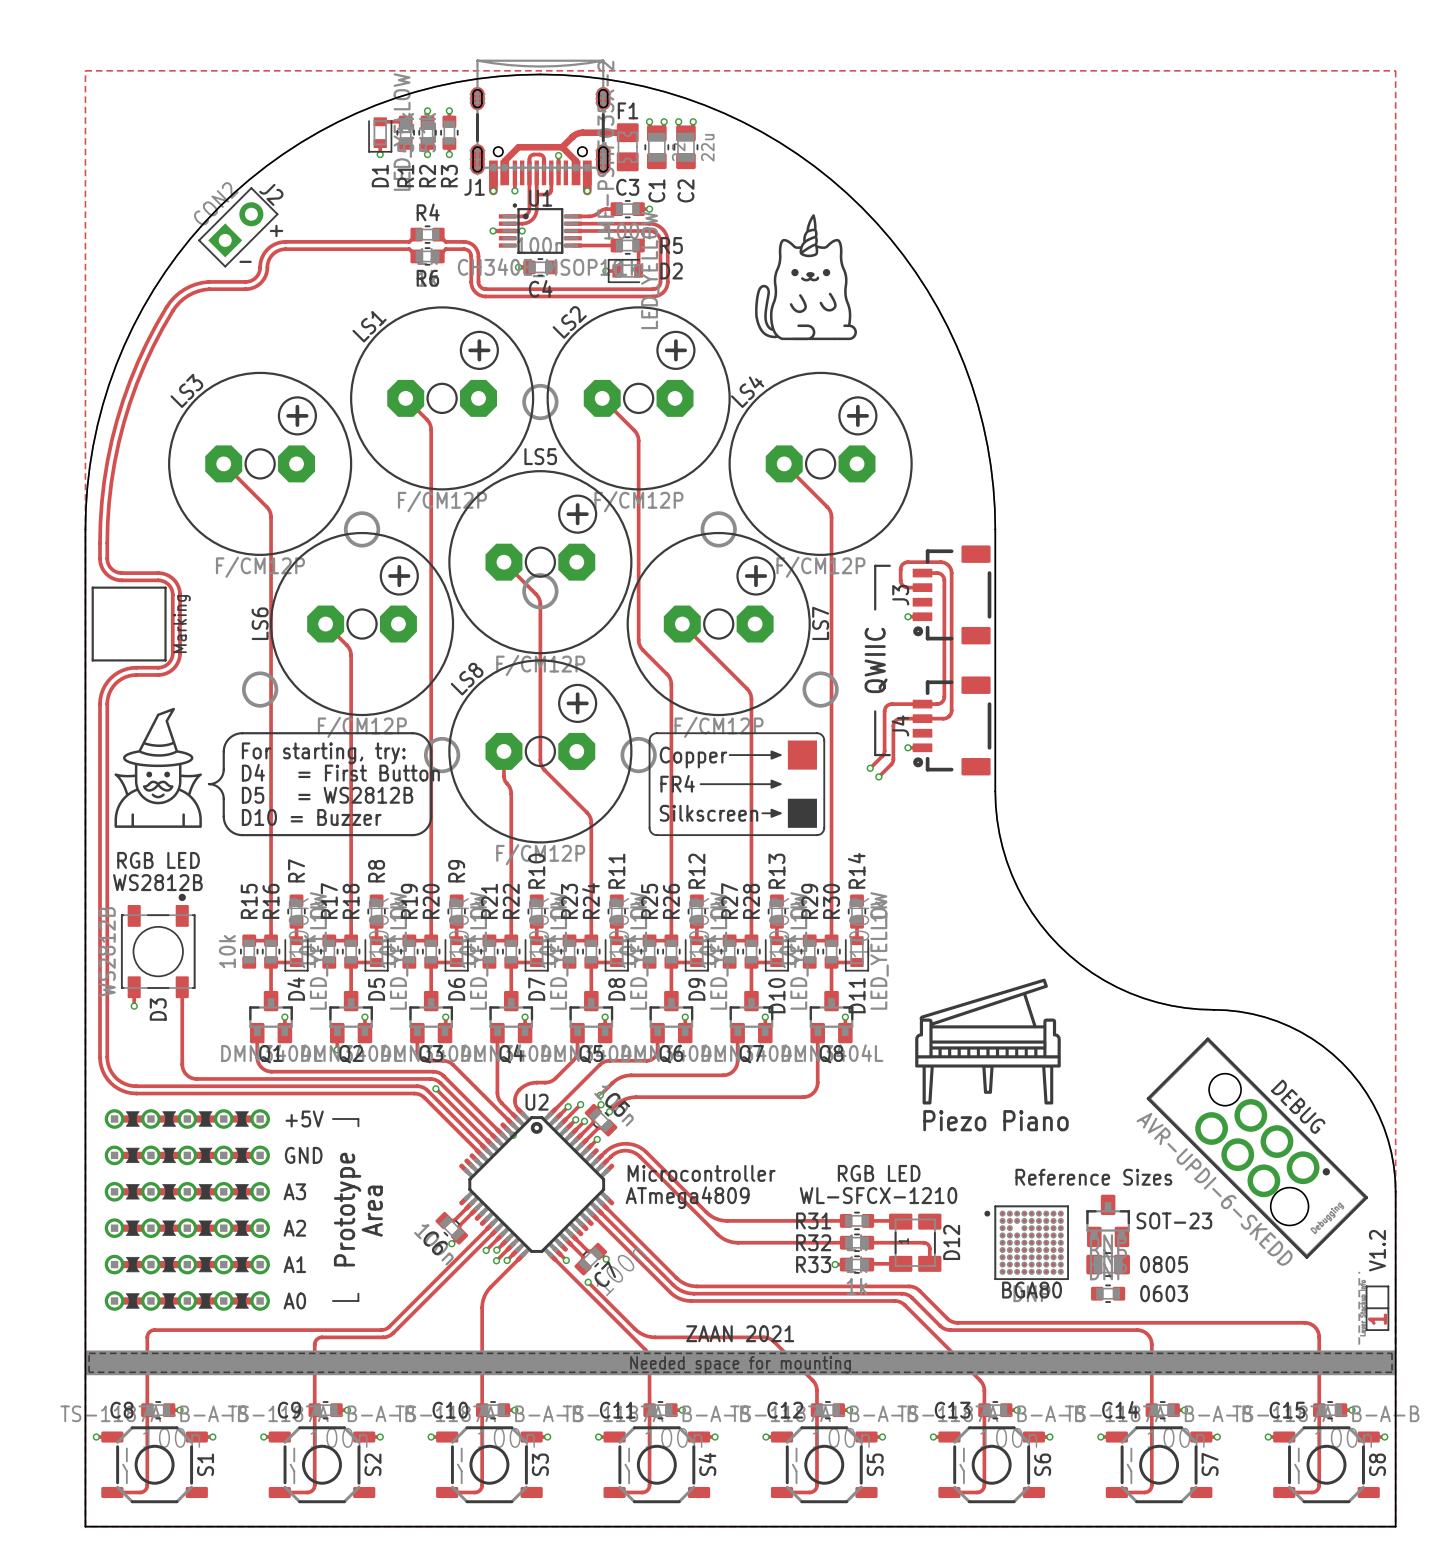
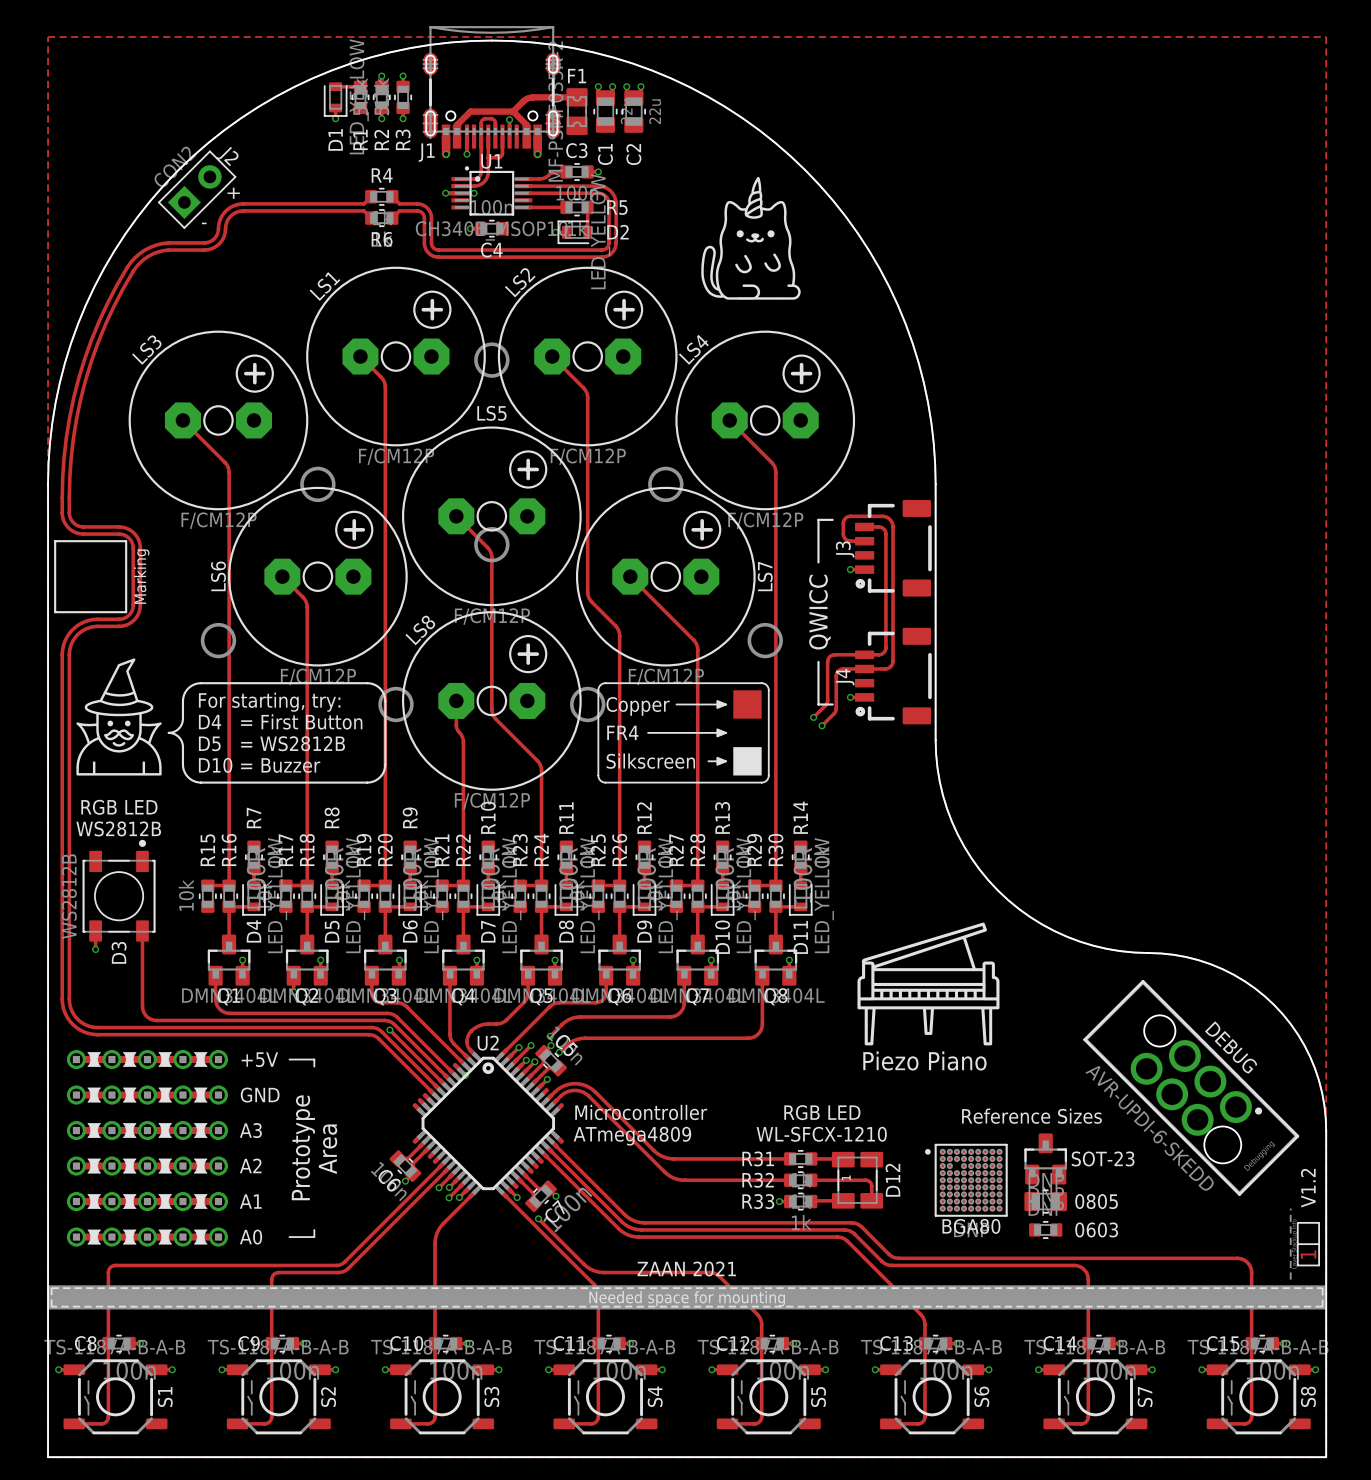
text: QWIIC (876, 660) -> QWICC (819, 612)

